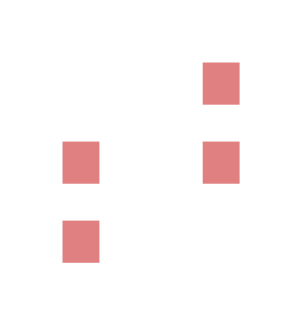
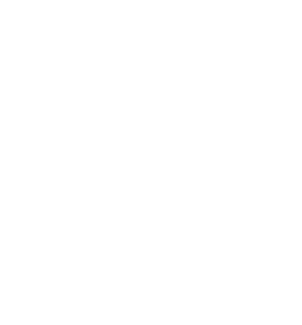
part: (221, 123) -> none
part: (80, 202) -> none

